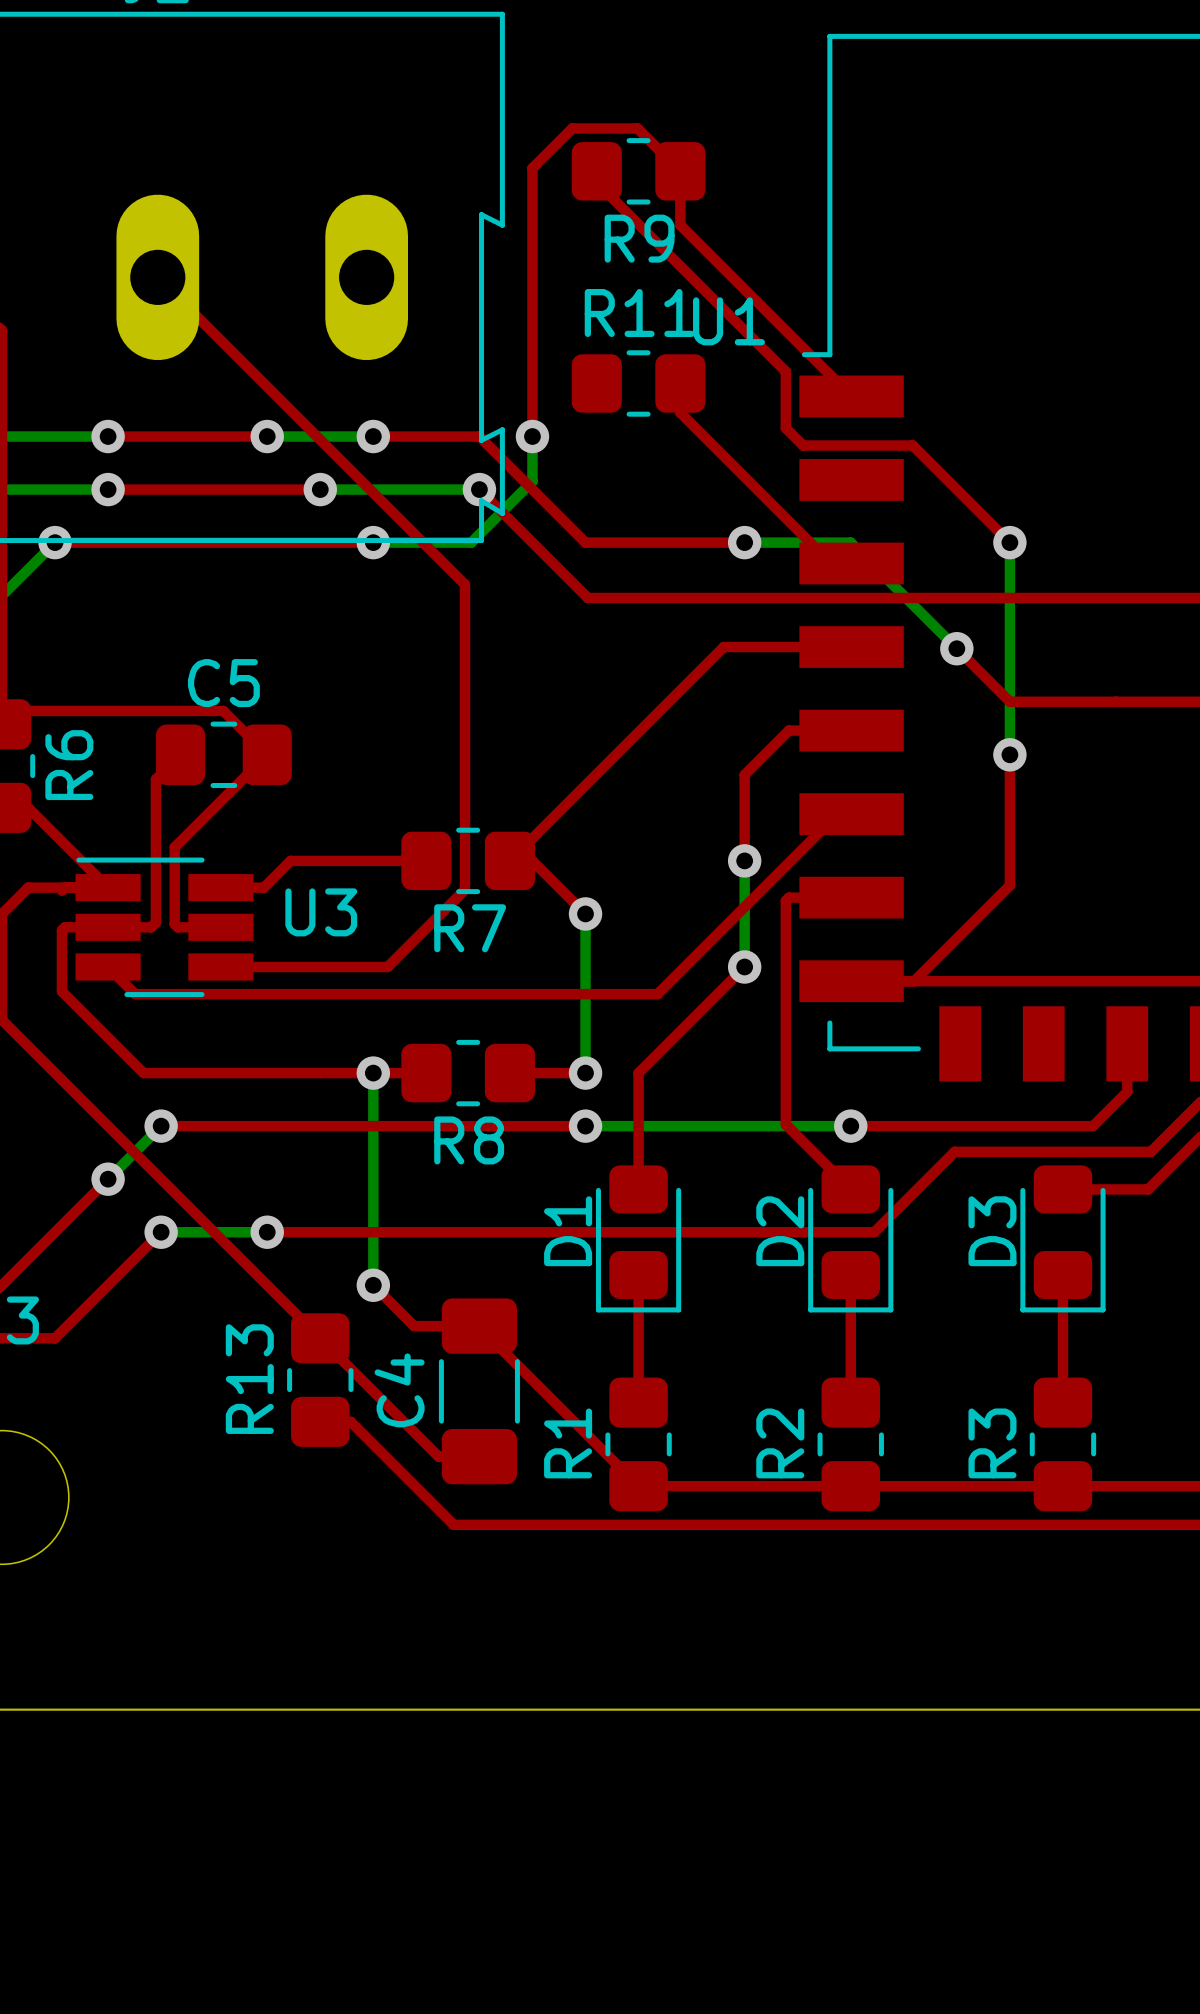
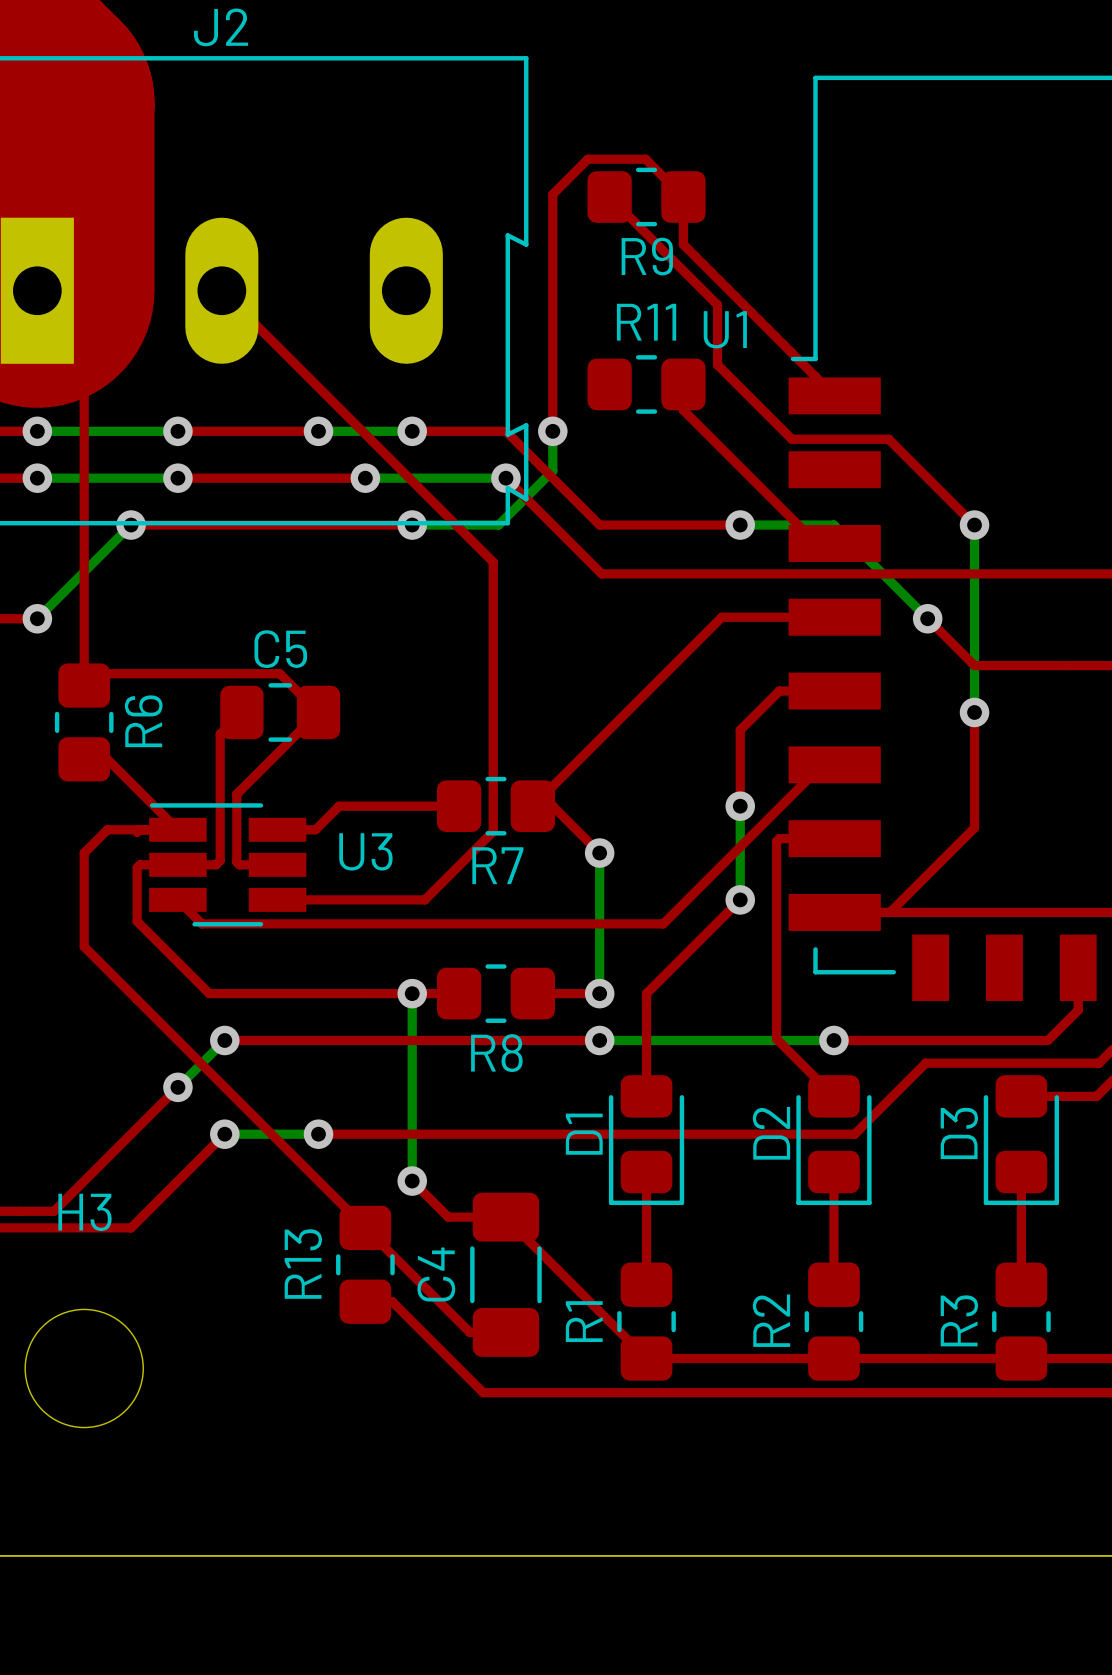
top track: (596, 171) (596, 182) (785, 371) (785, 428) -> (609, 197) (717, 304) (717, 364) (776, 423)

